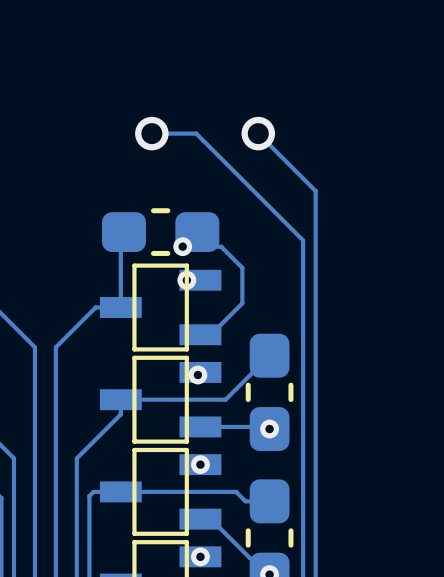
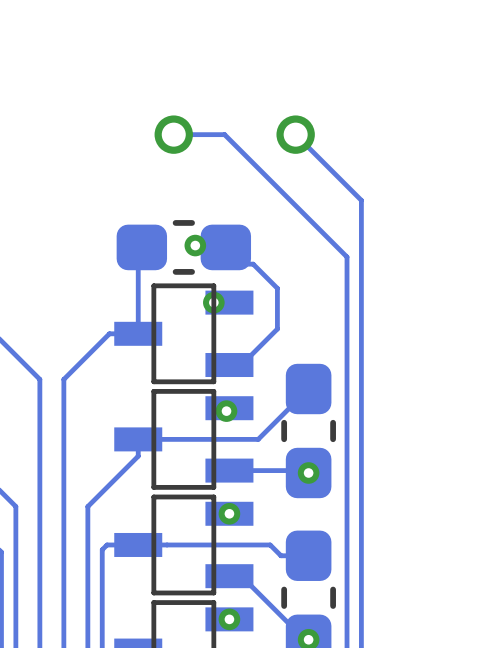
via position: (182, 246) -> (195, 245)

